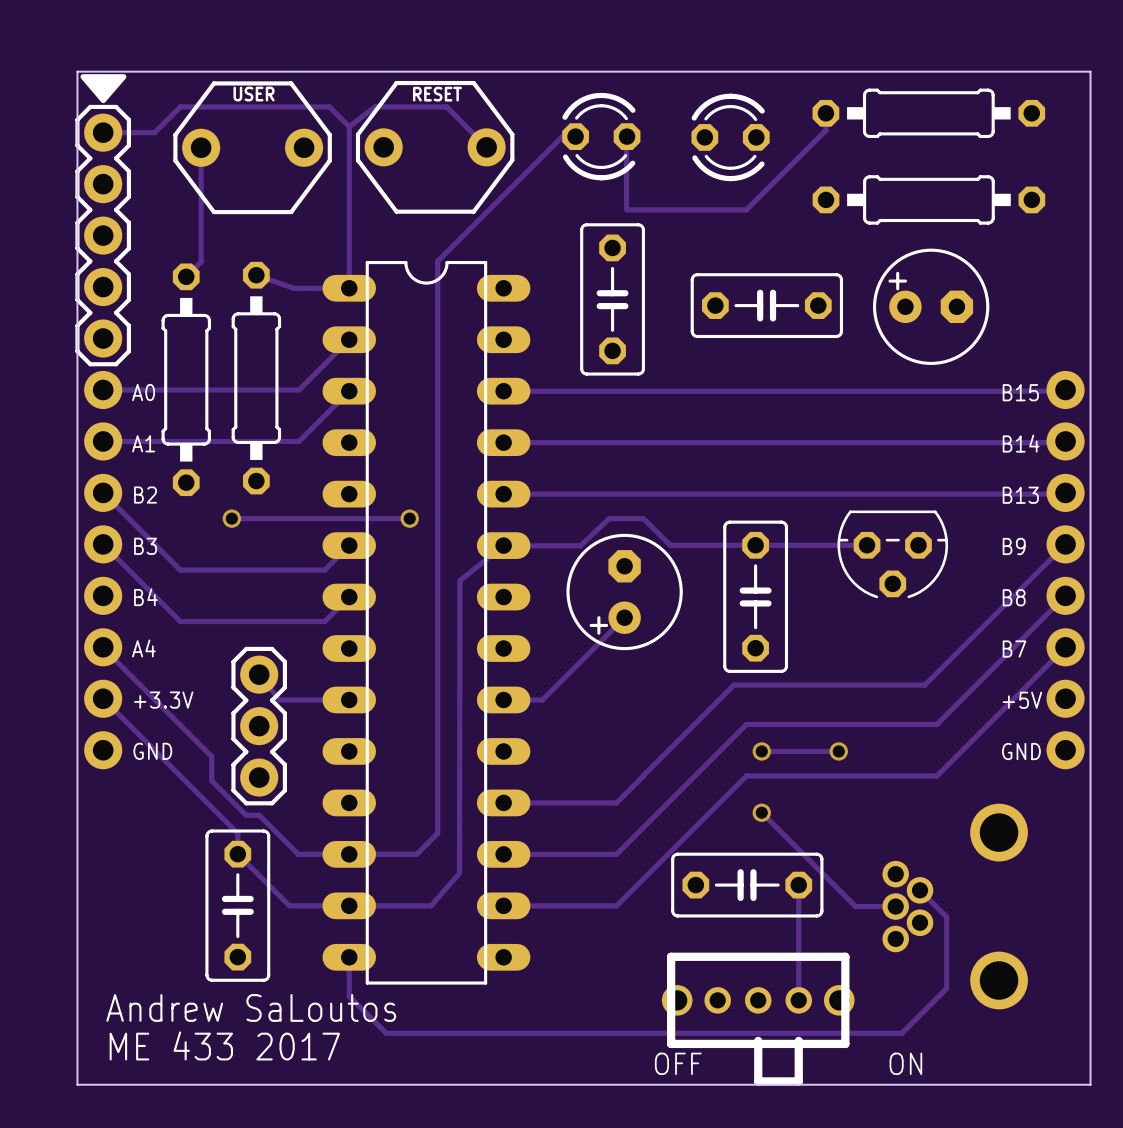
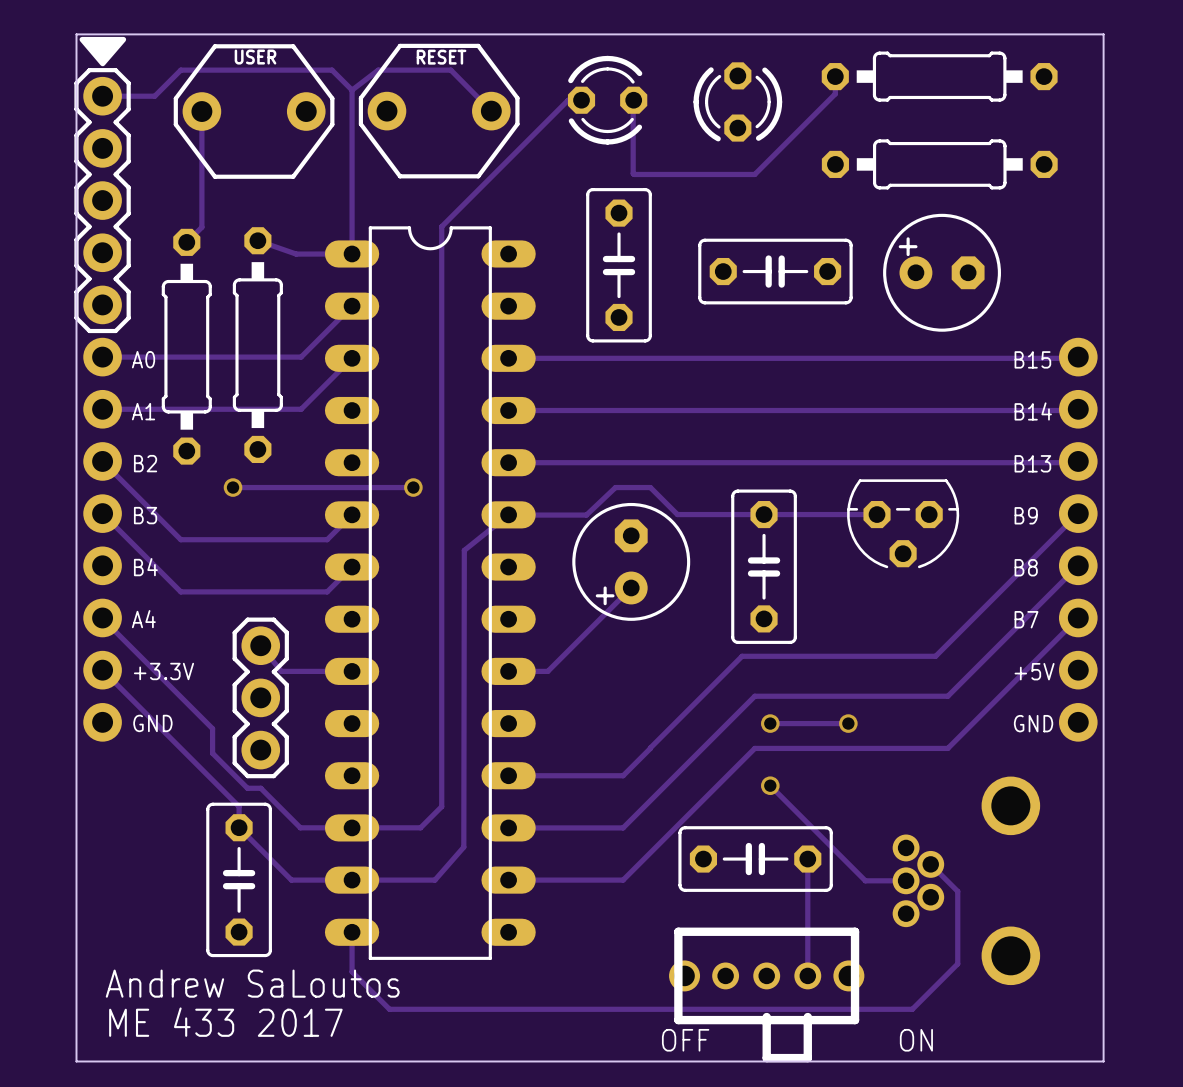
part rotation: 0° (730, 137) -> 90° counterclockwise (737, 101)

